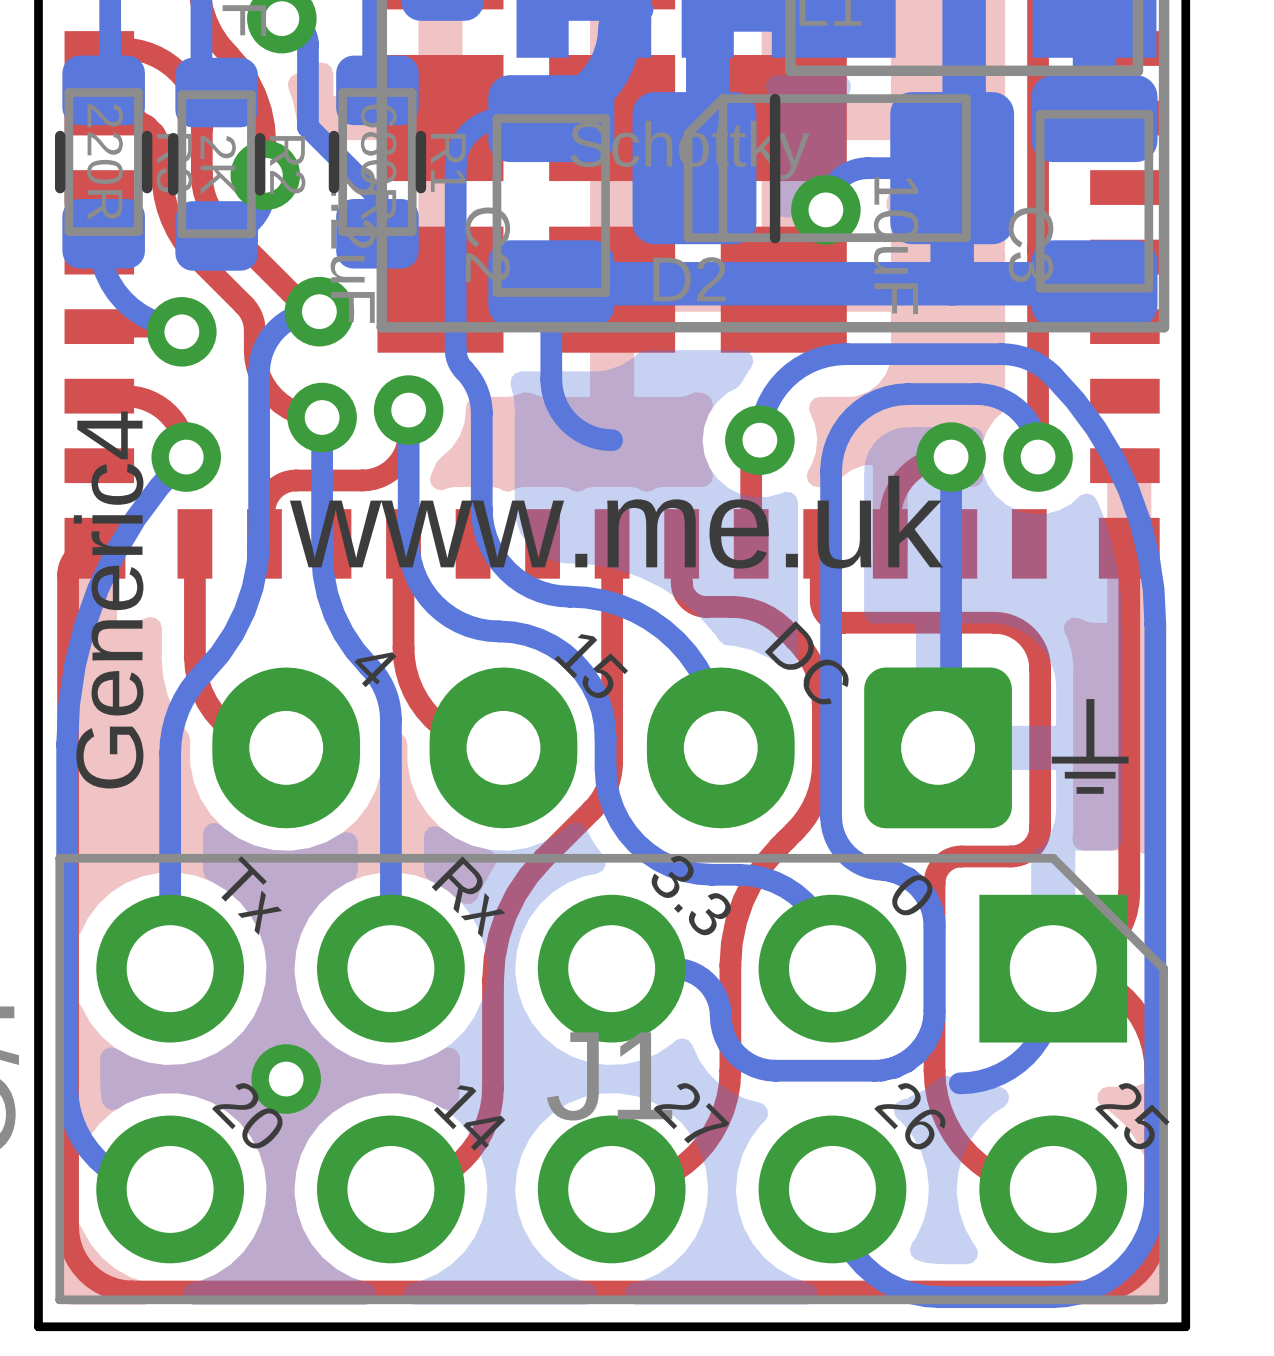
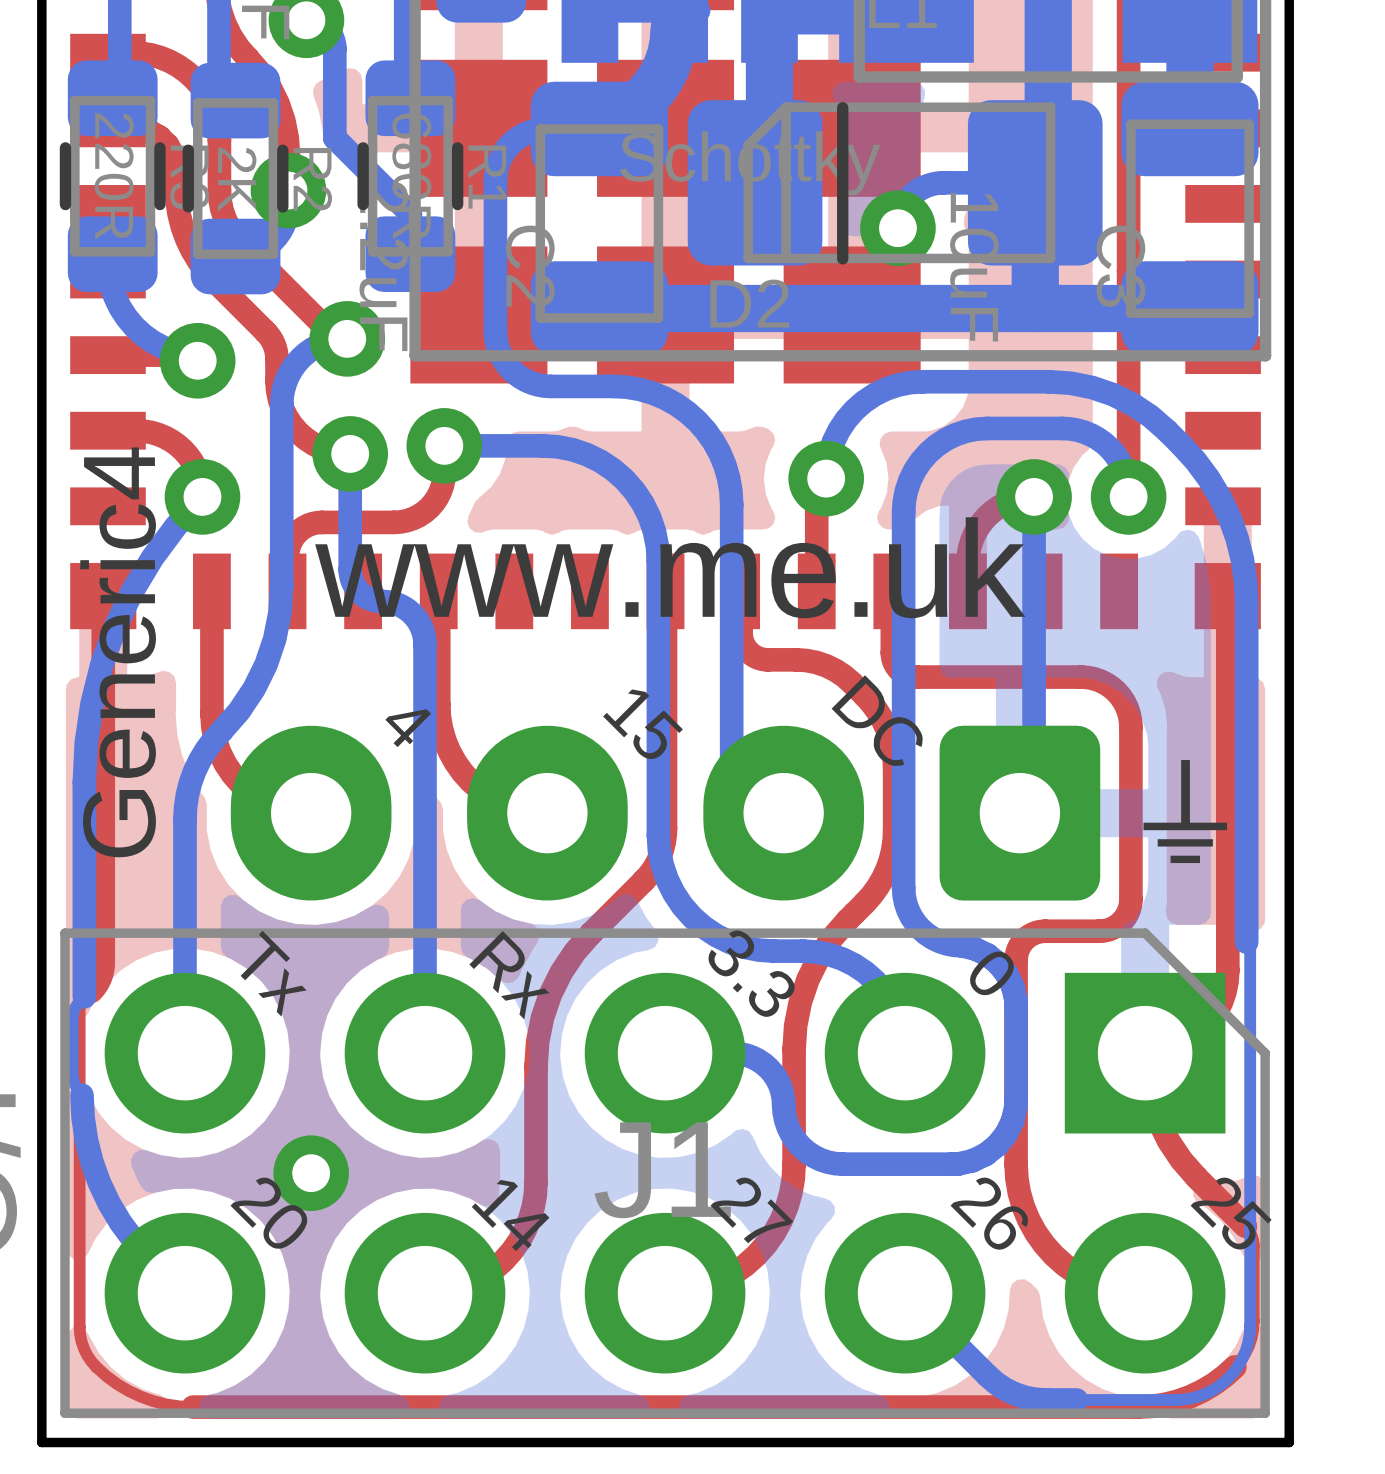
bottom track: (551, 283) (551, 379) (554, 399) (564, 417) (579, 430) (598, 438) (612, 440) -> none
bottom track: (455, 304) (456, 357) (474, 384) (480, 401) (482, 518) (486, 537) (495, 555) (514, 577) (531, 587) (550, 594) (586, 597) (619, 605) (649, 619) (663, 629) (687, 653) (705, 682) (716, 714) (720, 747) -> (495, 330) (496, 343) (503, 360) (511, 370) (526, 380) (544, 386) (626, 387) (652, 393) (687, 412) (713, 441) (725, 465) (730, 491) (732, 772) (739, 788) (751, 801) (766, 810) (783, 813)
bottom track: (408, 410) (409, 551) (413, 570) (422, 589) (435, 604) (459, 622) (479, 629) (526, 635) (552, 645) (563, 653) (574, 662) (591, 684) (601, 710) (605, 737) -> (444, 445) (542, 445) (572, 449) (600, 461) (613, 469) (634, 491) (642, 503) (654, 531) (658, 561) (658, 802)
bottom track: (759, 440) (764, 411) (778, 386) (800, 367) (817, 358) (845, 354) (1001, 354) (1029, 359) (1046, 370) (1075, 400) (1095, 428) (1113, 458) (1128, 489) (1140, 521) (1148, 555) (1153, 589) (1155, 624) (1155, 1193) (1151, 1220) (1141, 1245) (1125, 1266) (1114, 1275) (1091, 1289) (1078, 1293) (1051, 1297) (926, 1296) (898, 1289) (874, 1274) (864, 1265) (854, 1255) (840, 1230) (836, 1217) (832, 1189) -> (826, 478) (829, 453) (839, 430) (854, 410) (864, 401) (885, 389) (897, 385) (923, 381) (1048, 381) (1091, 387) (1132, 404) (1150, 416) (1195, 461) (1220, 497) (1229, 517) (1237, 538) (1245, 581) (1246, 942) (1250, 945) (1250, 1325) (1248, 1342) (1242, 1357) (1233, 1371) (1222, 1383) (1208, 1392) (1192, 1398) (1175, 1399) (1035, 1399) (1014, 1393) (995, 1383) (905, 1293)
bottom track: (186, 457) (159, 486) (135, 518) (115, 552) (98, 588) (84, 626) (74, 665) (69, 704) (67, 744) (67, 1086) (69, 1109) (82, 1141) (105, 1166) (136, 1183) (170, 1189) -> (202, 496) (175, 526) (152, 558) (131, 591) (115, 627) (101, 665) (92, 703) (86, 742) (84, 782) (84, 996) (76, 1006) (72, 1019) (73, 1078) (81, 1095) (86, 1139) (99, 1182) (109, 1203) (134, 1240) (185, 1293)
bottom track: (322, 523) (323, 574) (334, 614) (355, 650) (381, 684) (387, 697) (390, 719) -> (350, 569) (352, 581) (362, 594) (373, 600) (391, 602) (404, 608) (415, 617) (422, 630) (425, 644) (425, 782)
top track: (94, 548) (84, 550) (75, 556) (70, 564) (68, 575) (68, 1226) (70, 1243) (81, 1266) (93, 1278) (107, 1286) (132, 1291) (1095, 1291) (1115, 1288) (1132, 1278) (1142, 1269) (1149, 1257) (1154, 1238) (1155, 1070) (1152, 1048) (1139, 1016) (1116, 990) (1086, 974) (1053, 968) -> (103, 596) (103, 962) (97, 982) (91, 991) (83, 994) (79, 1003) (79, 1326) (81, 1341) (91, 1361) (116, 1383) (140, 1396) (166, 1404) (193, 1407) (1137, 1407) (1177, 1401) (1202, 1390) (1224, 1375) (1240, 1360) (1248, 1345) (1253, 1321) (1253, 1243) (1247, 1228) (1196, 1177) (1181, 1160) (1168, 1141) (1158, 1120) (1151, 1098) (1146, 1076) (1145, 1053)
bottom track: (1053, 968) (1050, 1010) (1043, 1030) (1032, 1048) (1018, 1063) (1000, 1074) (980, 1081) (959, 1083) -> none

